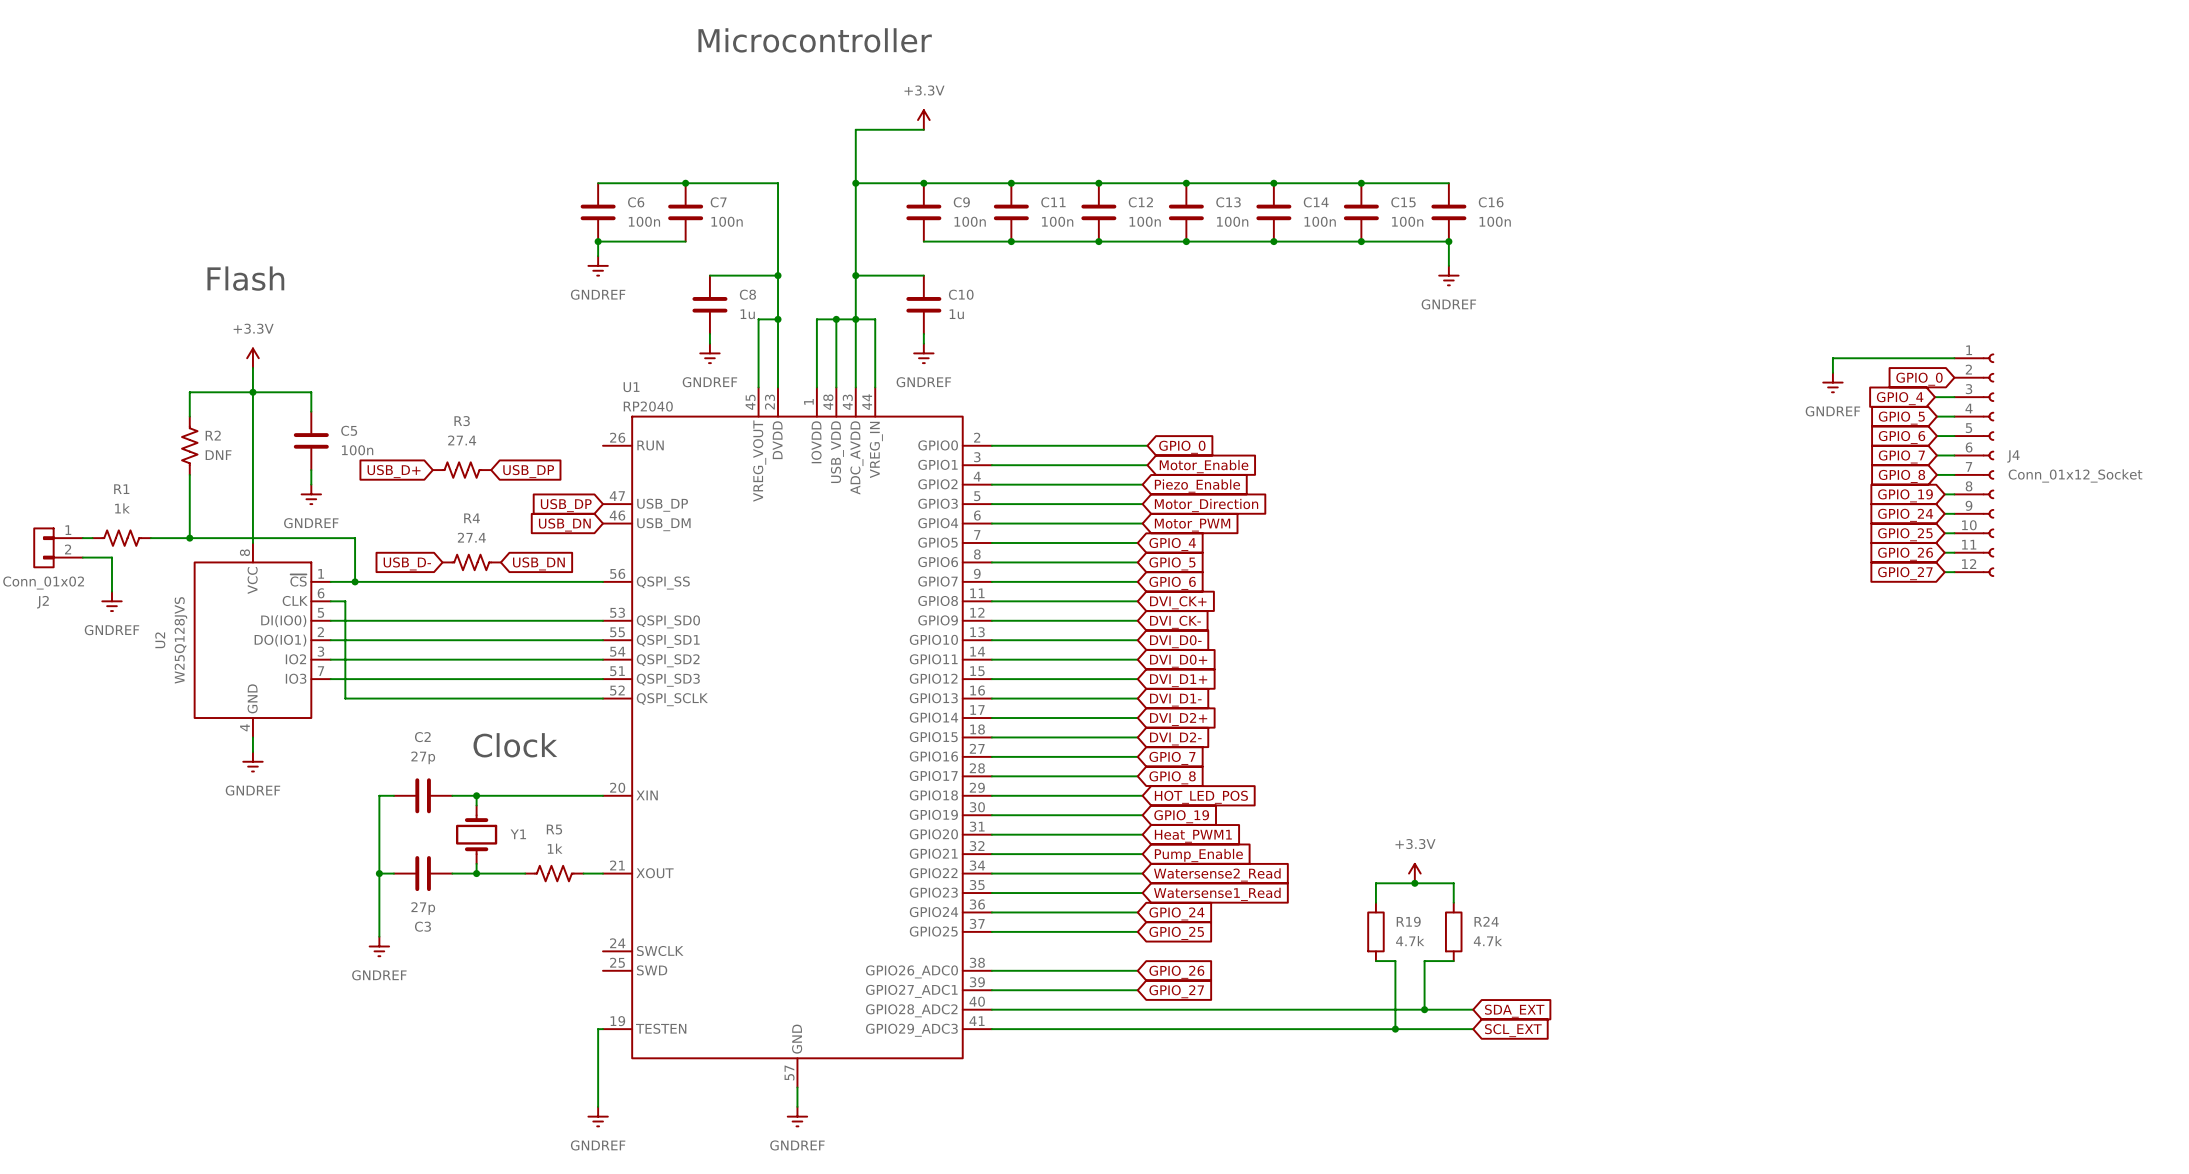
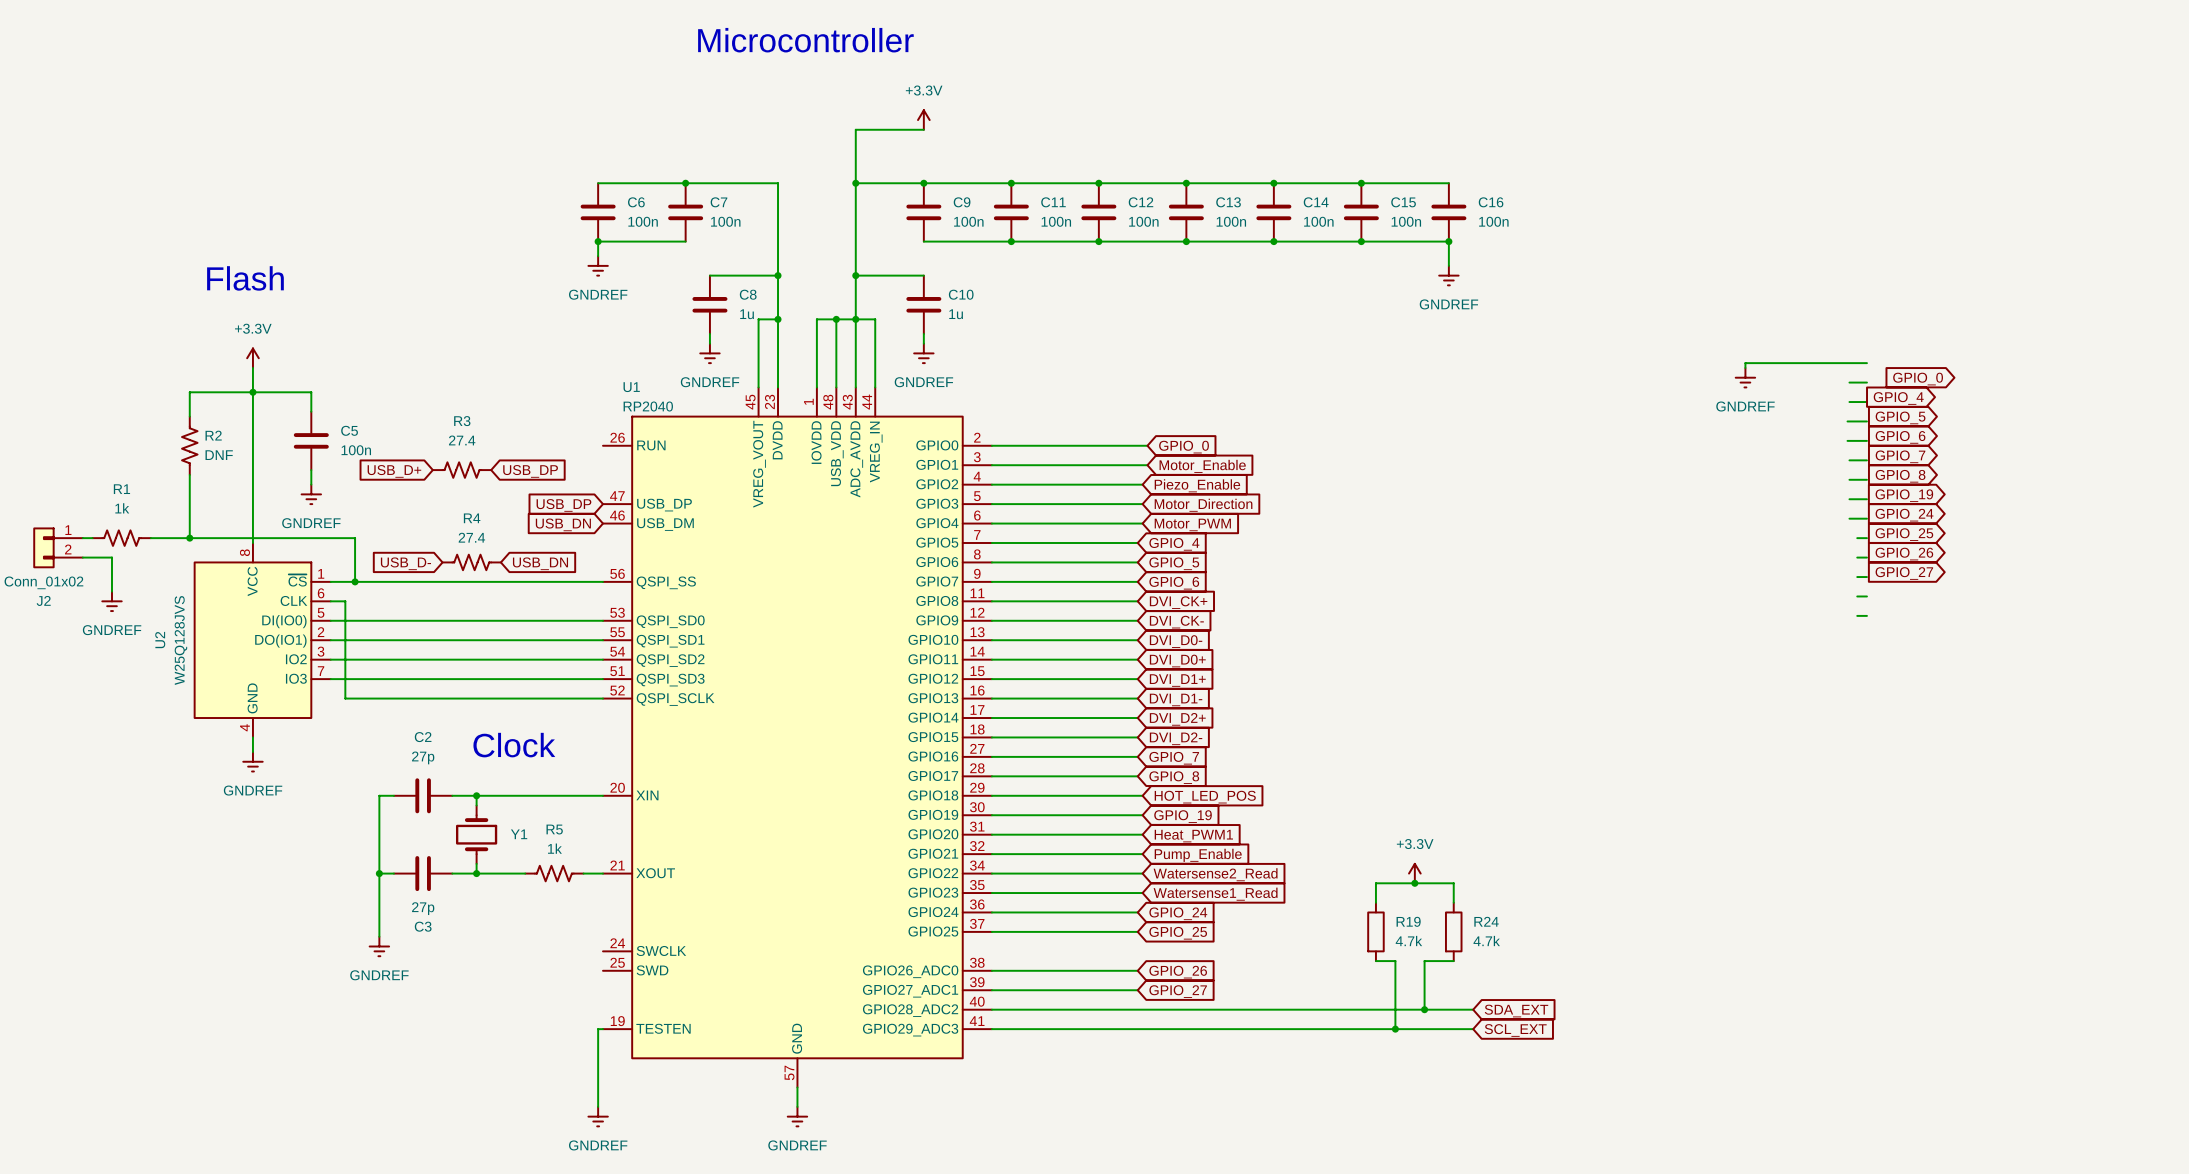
wire: (1954, 358) (1832, 358) (1832, 372) -> none
wire: none -> (1866, 363) (1745, 363) (1745, 367)
power symbol position: GNDREF (1832, 382) -> GNDREF (1745, 377)
wire: none -> (1849, 382) (1866, 382)
wire: (1935, 397) (1954, 397) -> (1847, 440) (1866, 440)
wire: none -> (1849, 402) (1866, 402)
wire: (1936, 416) (1954, 416) -> (1849, 460) (1866, 460)
wire: none -> (1847, 421) (1866, 421)
wire: (1936, 436) (1954, 436) -> (1849, 479) (1866, 479)
wire: (1936, 455) (1954, 455) -> (1849, 499) (1866, 499)
J4: Conn_01x12_Socket (1974, 465) -> none
wire: (1936, 474) (1954, 474) -> (1849, 518) (1866, 518)
wire: (1944, 494) (1954, 494) -> (1857, 538) (1866, 538)
wire: (1944, 513) (1954, 513) -> (1857, 557) (1866, 557)
wire: (1944, 533) (1954, 533) -> (1857, 577) (1866, 577)
wire: (1944, 552) (1954, 552) -> (1857, 596) (1866, 596)
wire: (1944, 572) (1954, 572) -> (1857, 615) (1866, 615)

